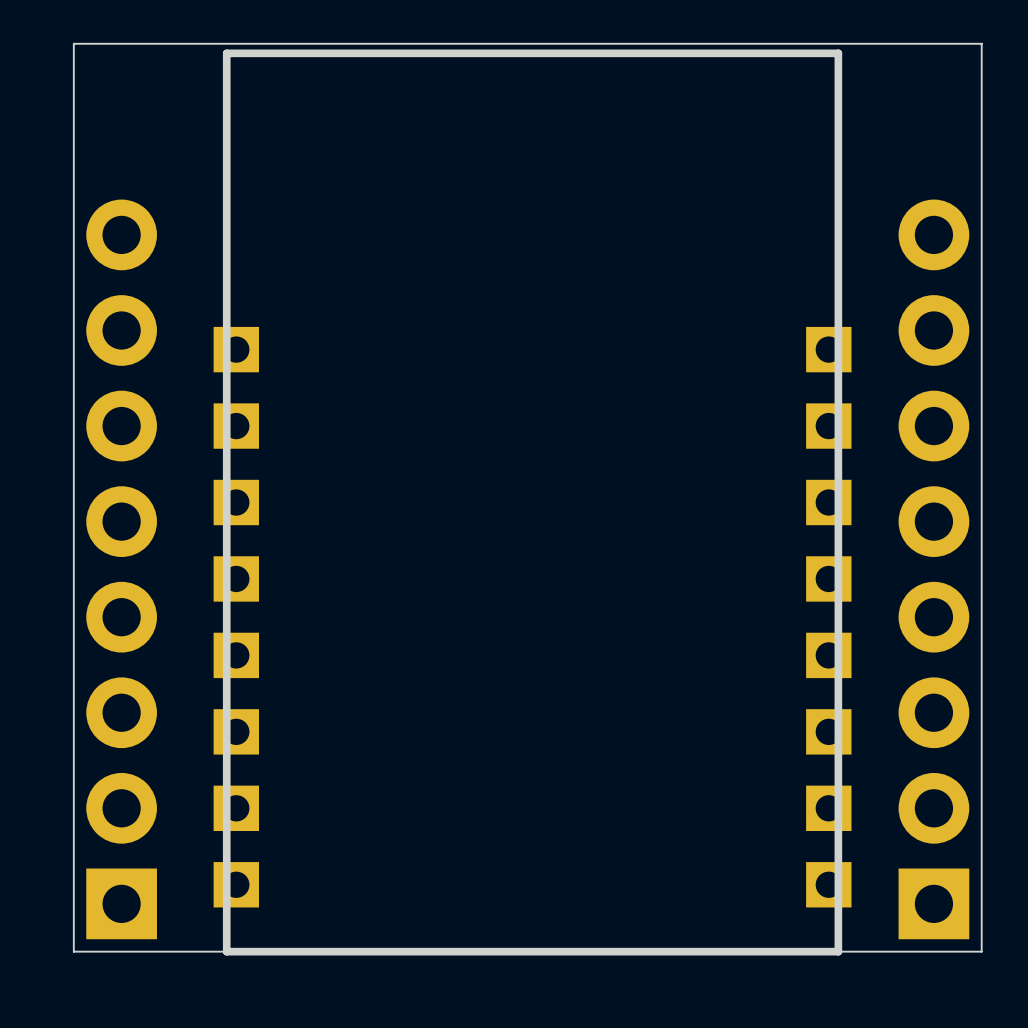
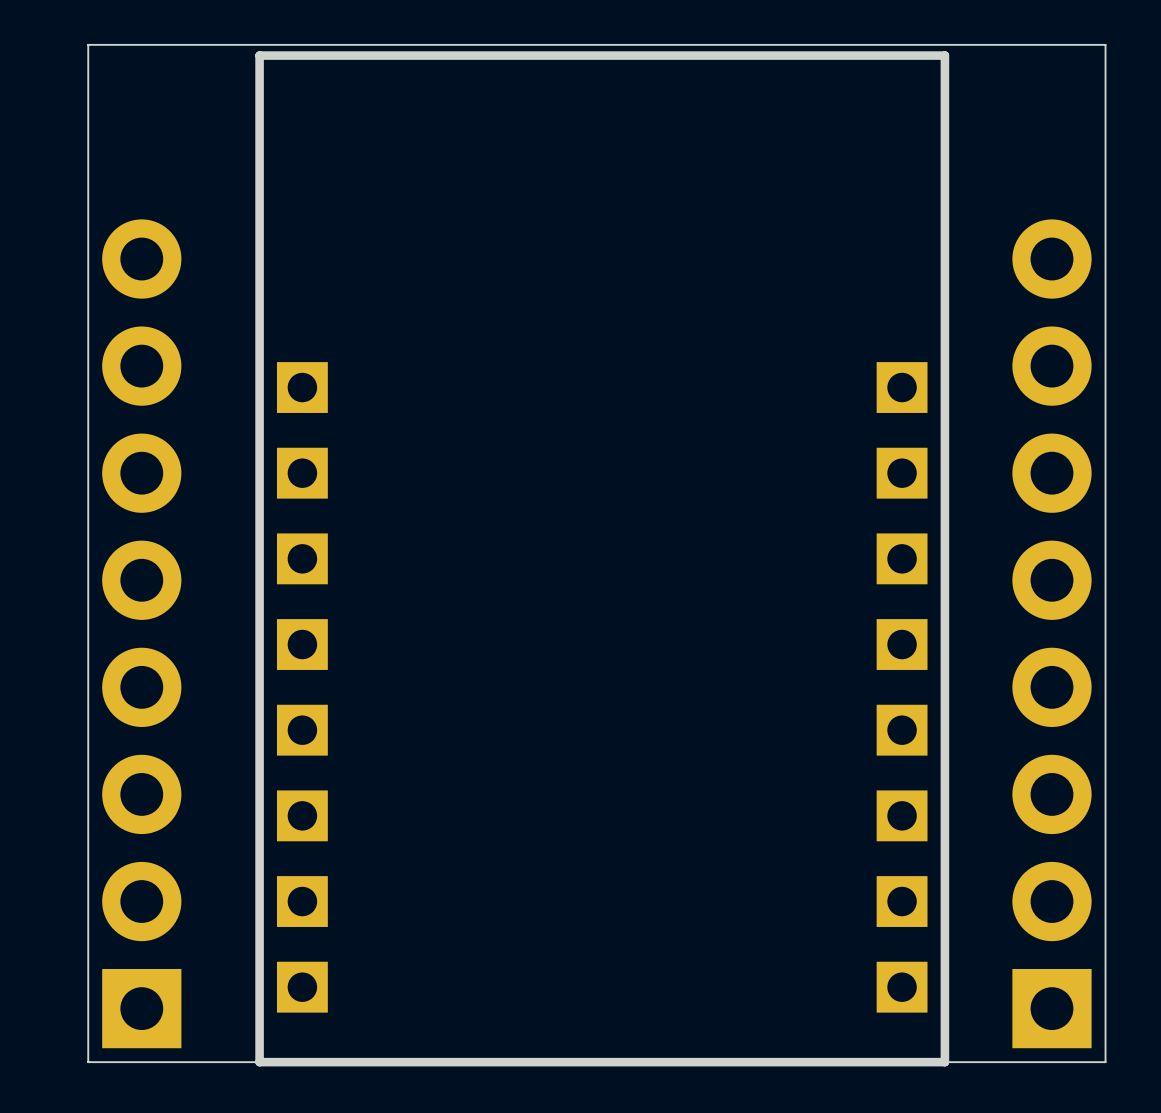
part footprint: [213, 49, 852, 956] -> [255, 51, 950, 1067]

